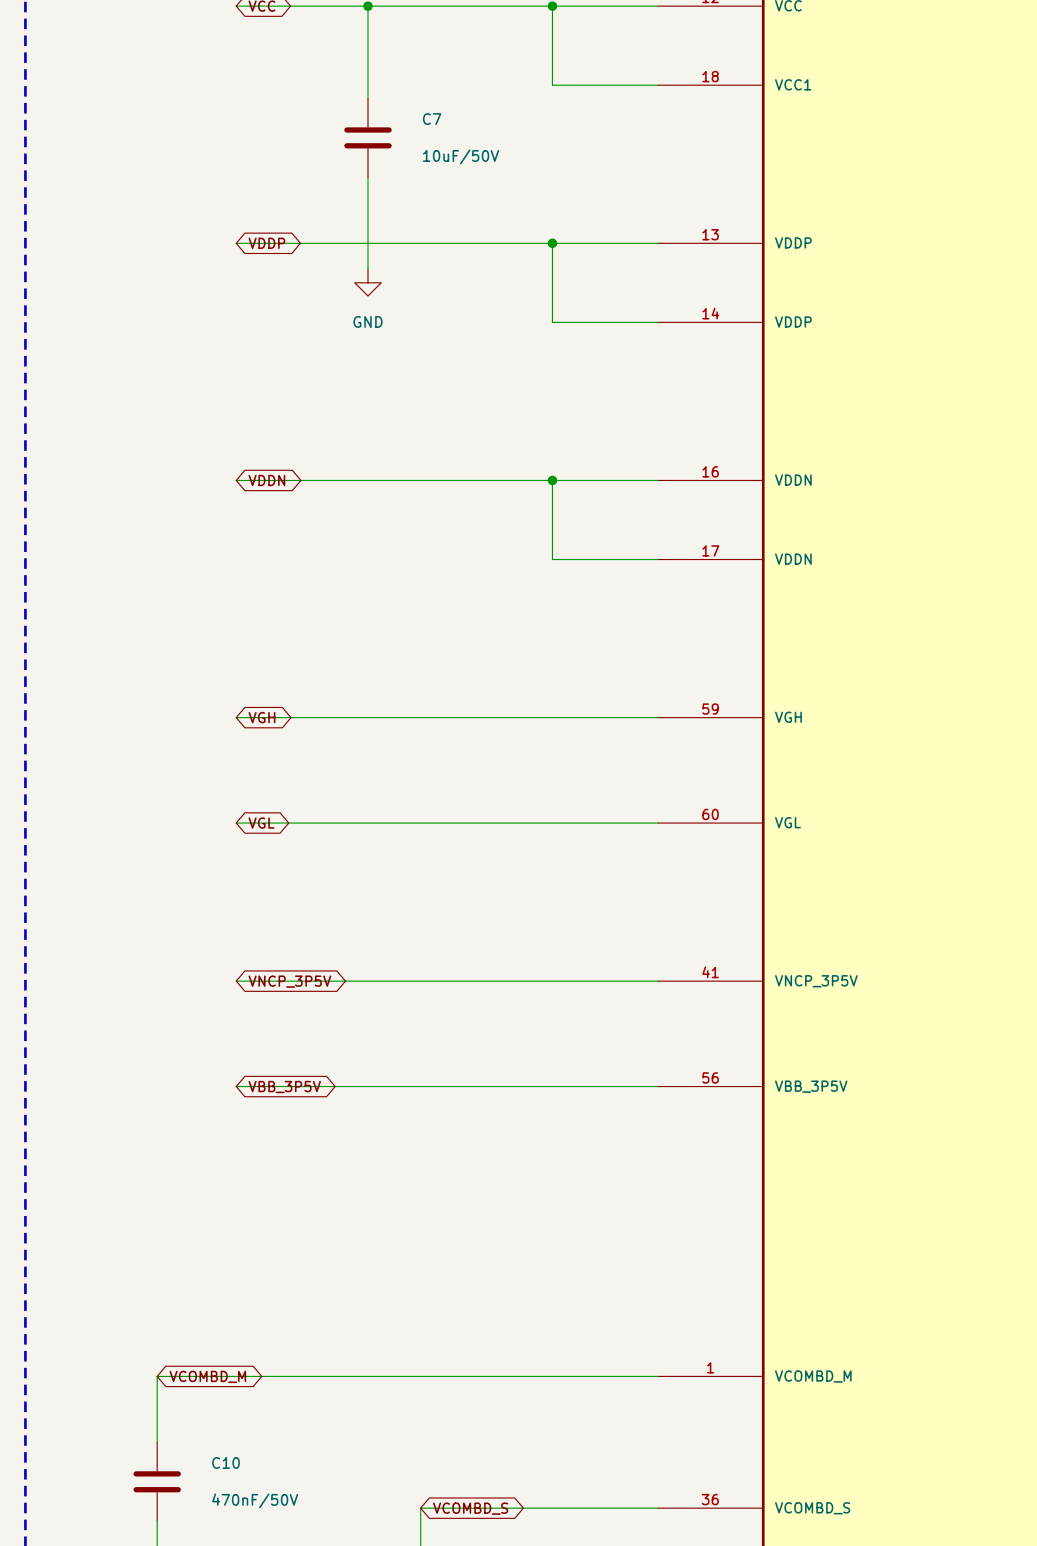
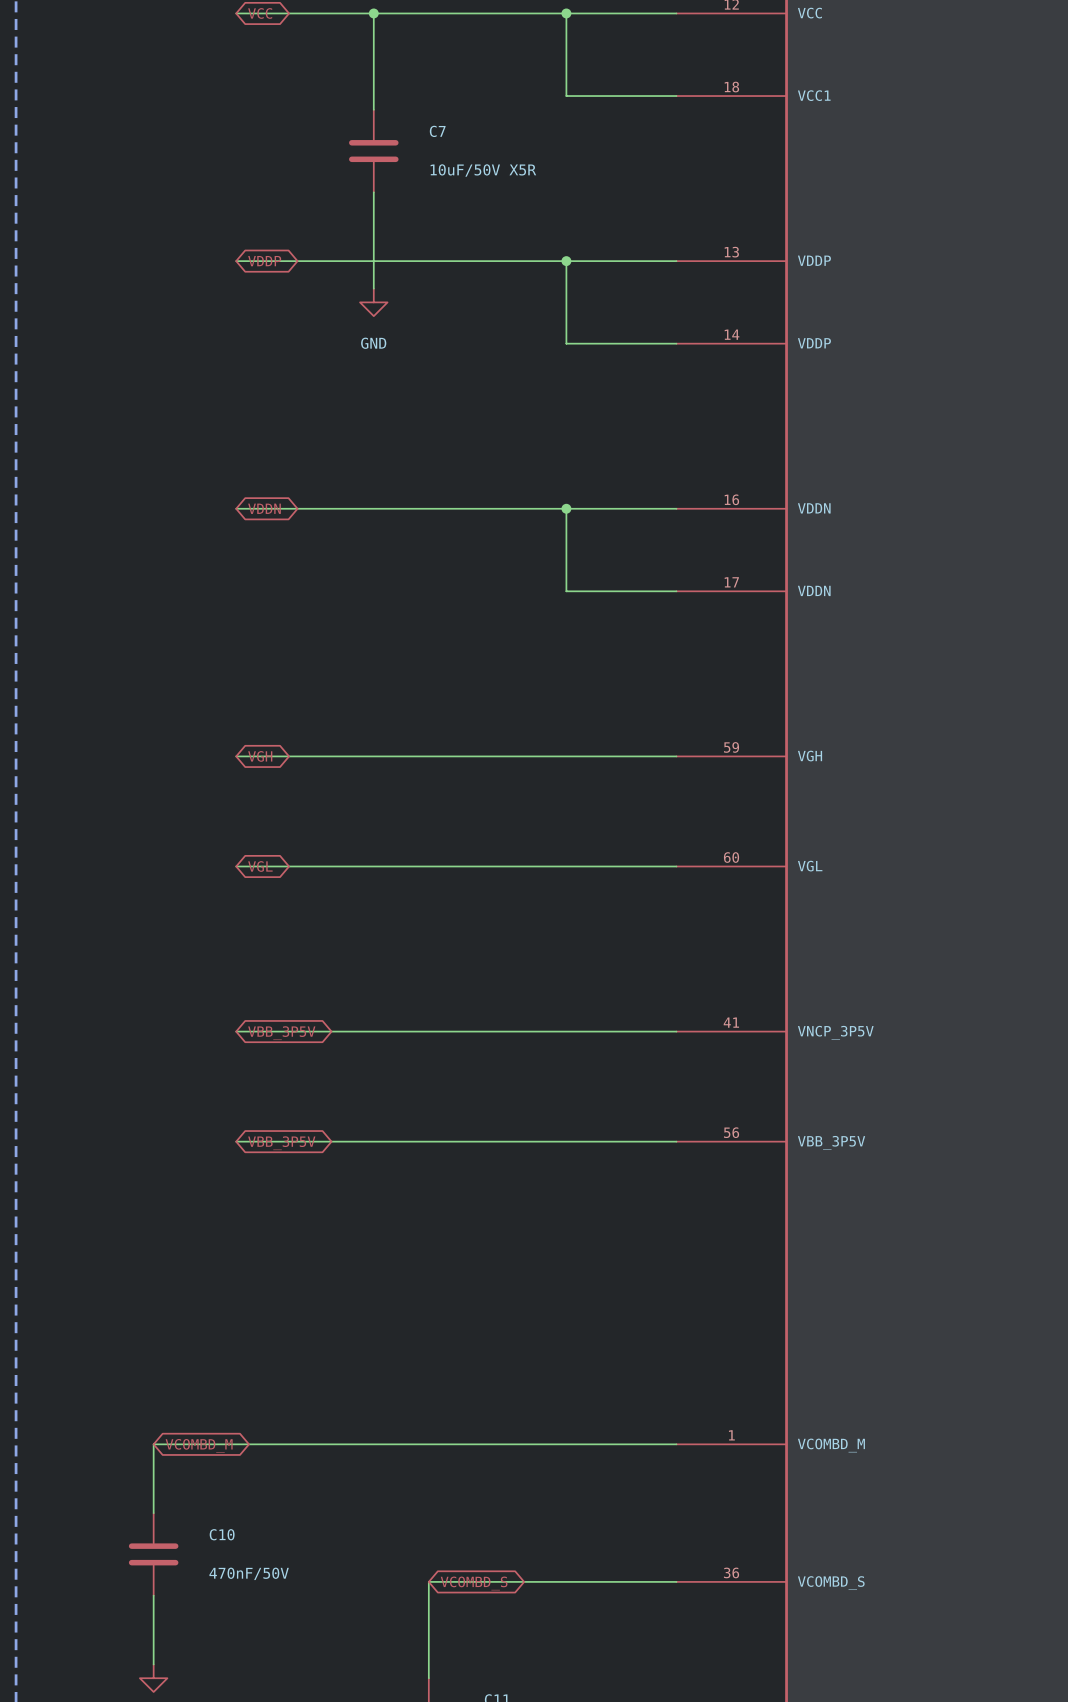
C7 value: 10uF/50V (461, 156) -> 10uF/50V X5R (483, 170)
global label: VNCP_3P5V (289, 981) -> VBB_3P5V (281, 1033)

